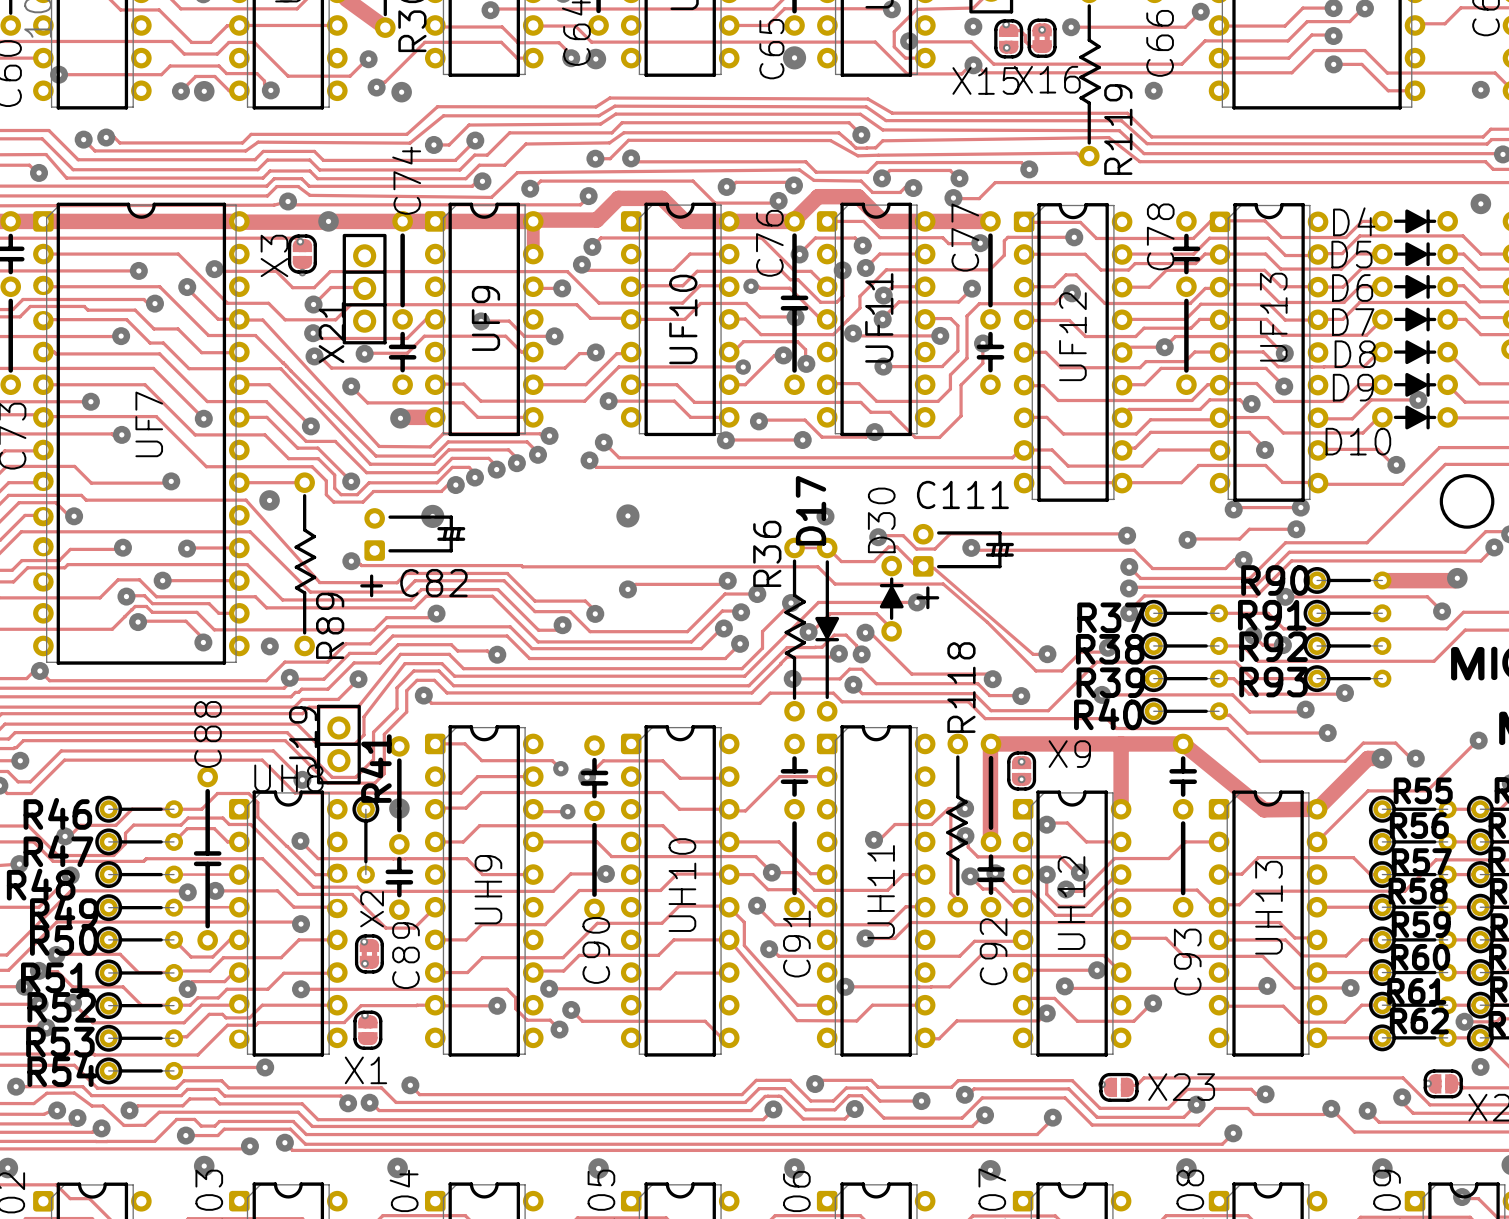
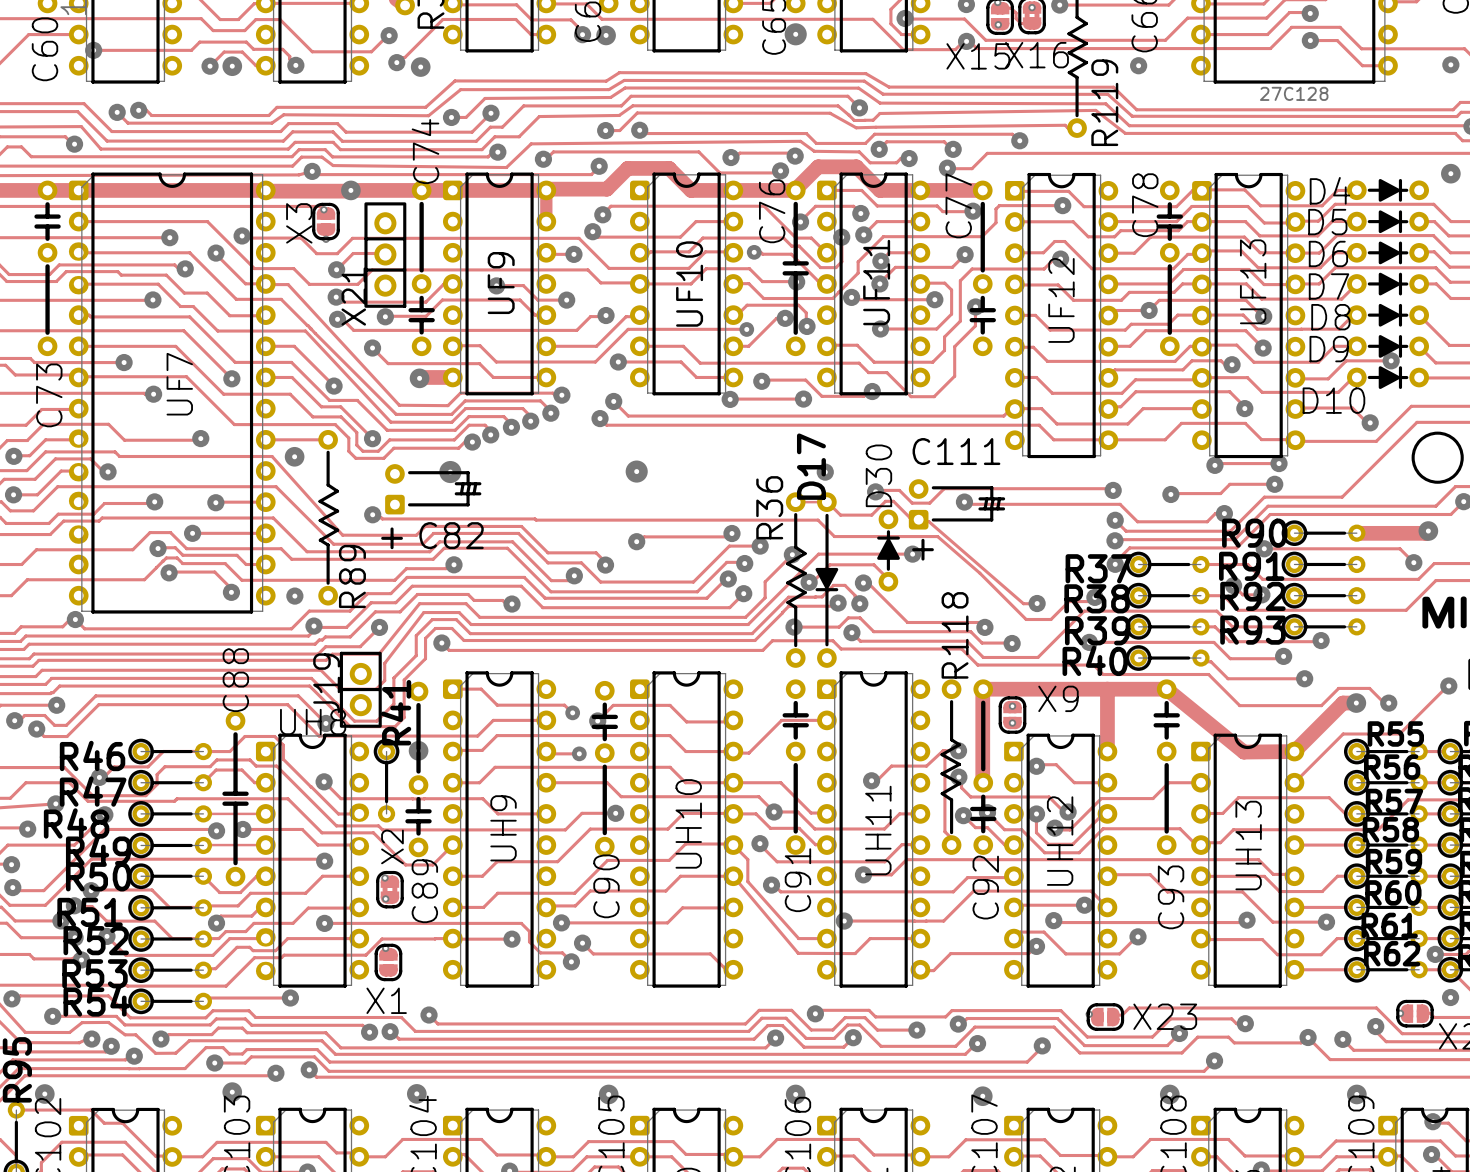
part value: none -> 27C128 (1294, 93)

